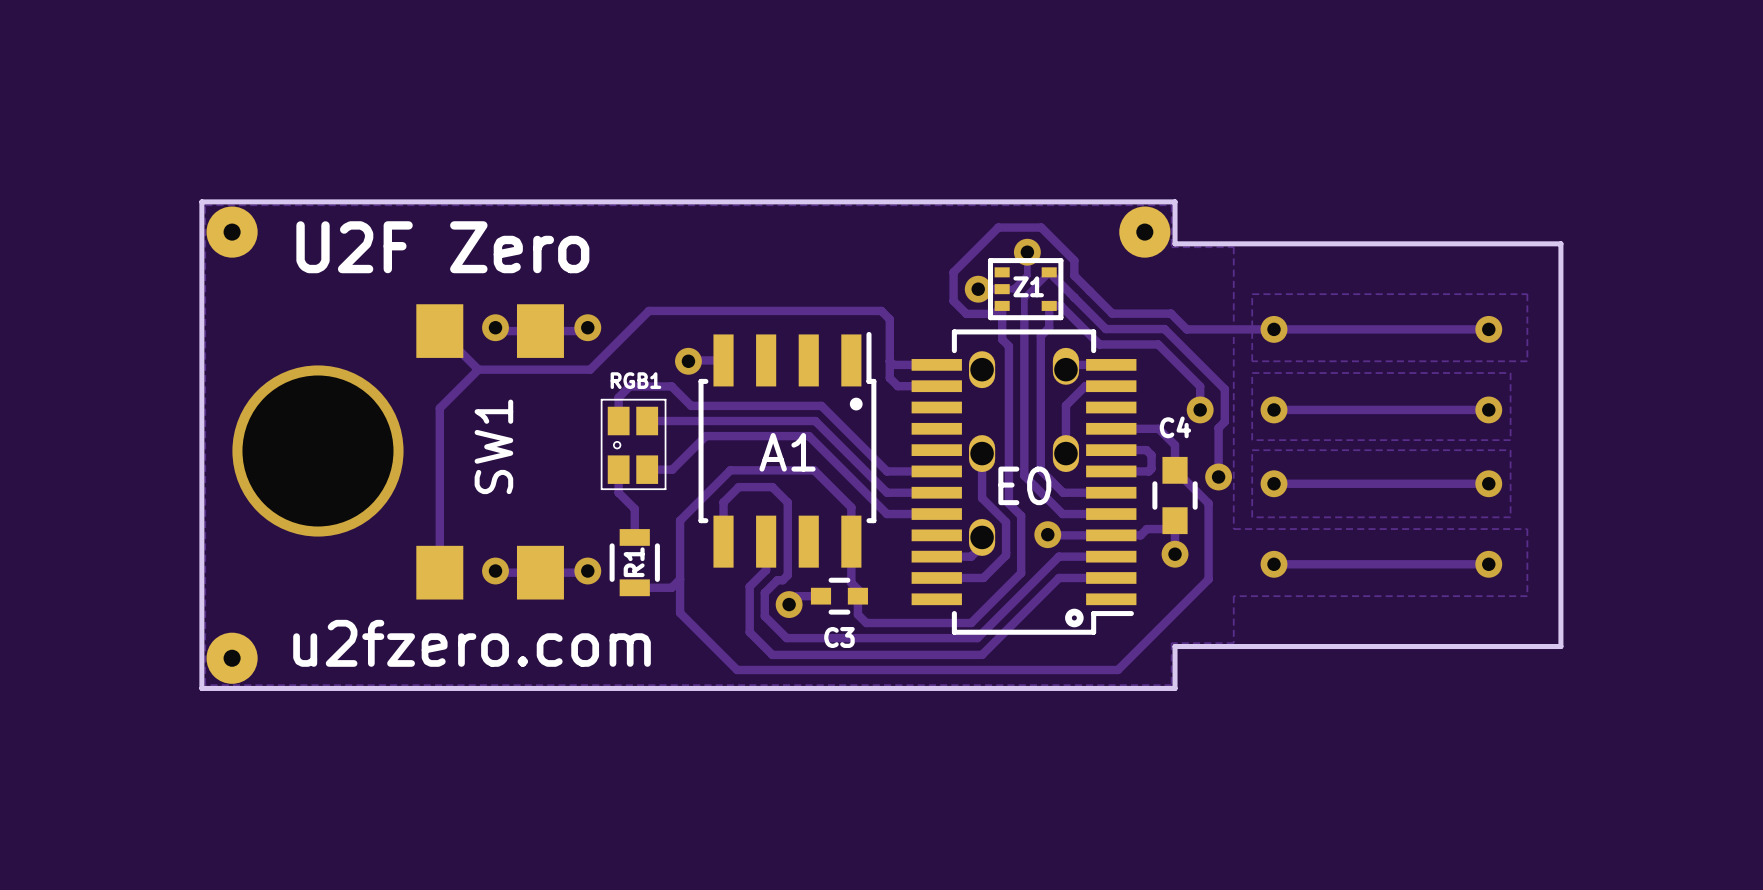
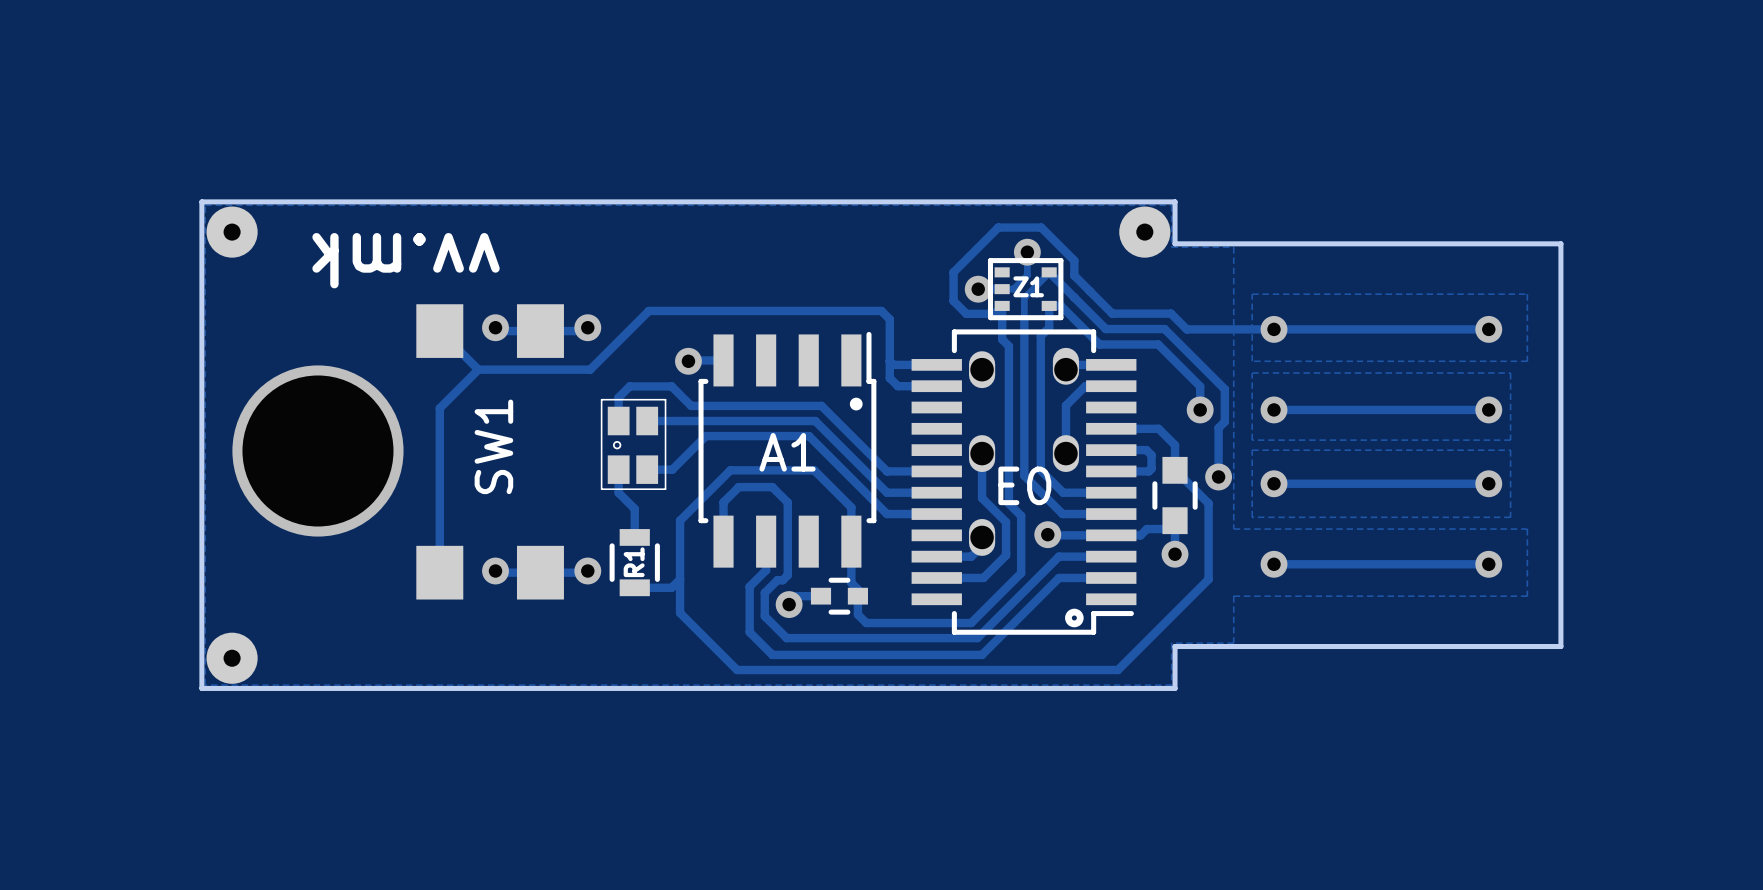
text: U2F Zero (442, 247) -> none
text: none -> vv.mk (406, 260)
RGB1 name: RGB1 (635, 380) -> none
C4 name: C4 (1175, 427) -> none
C3 name: C3 (839, 637) -> none
text: u2fzero.com (472, 643) -> none

